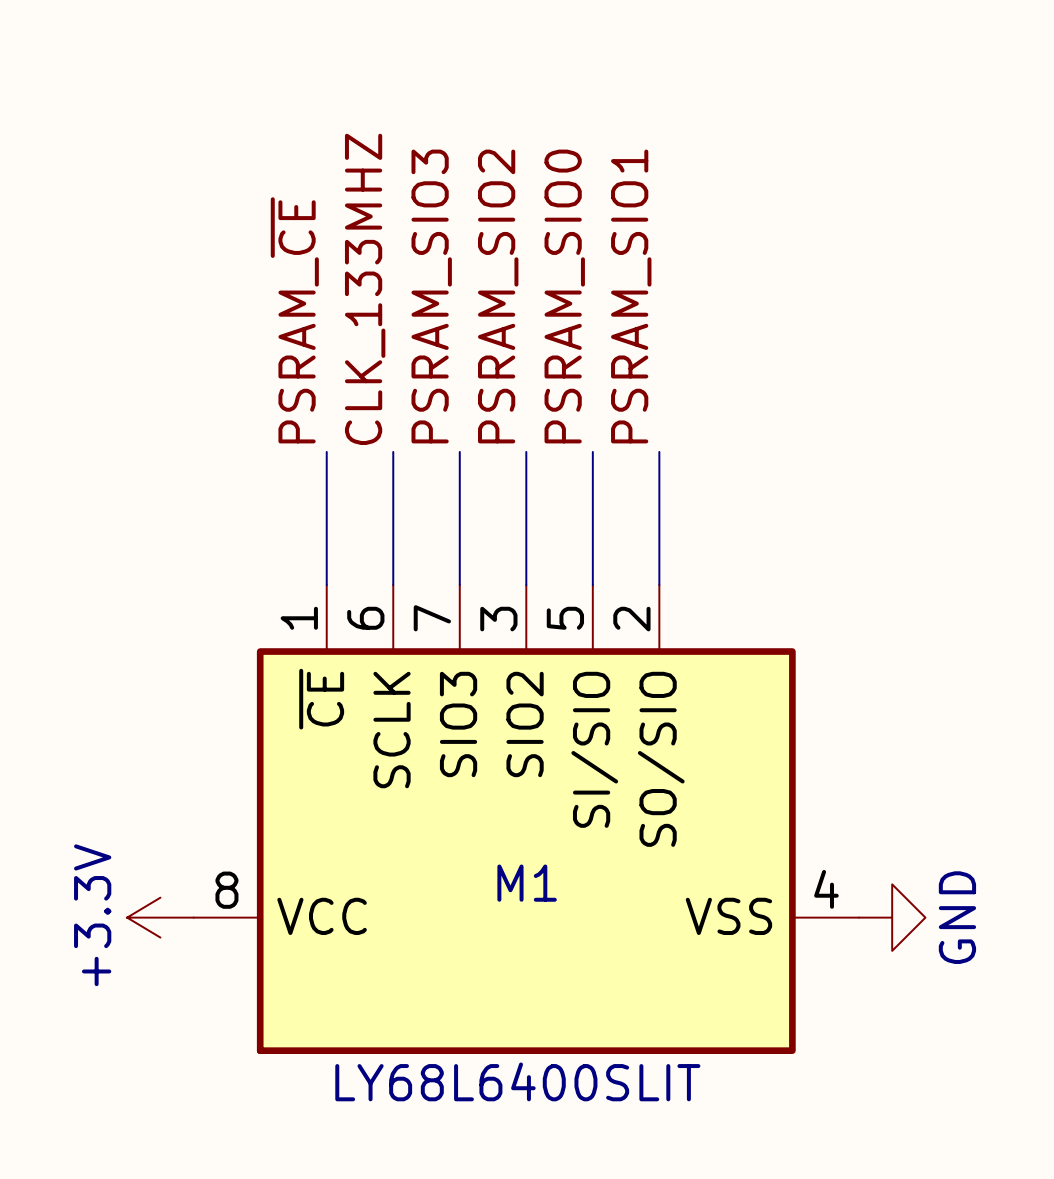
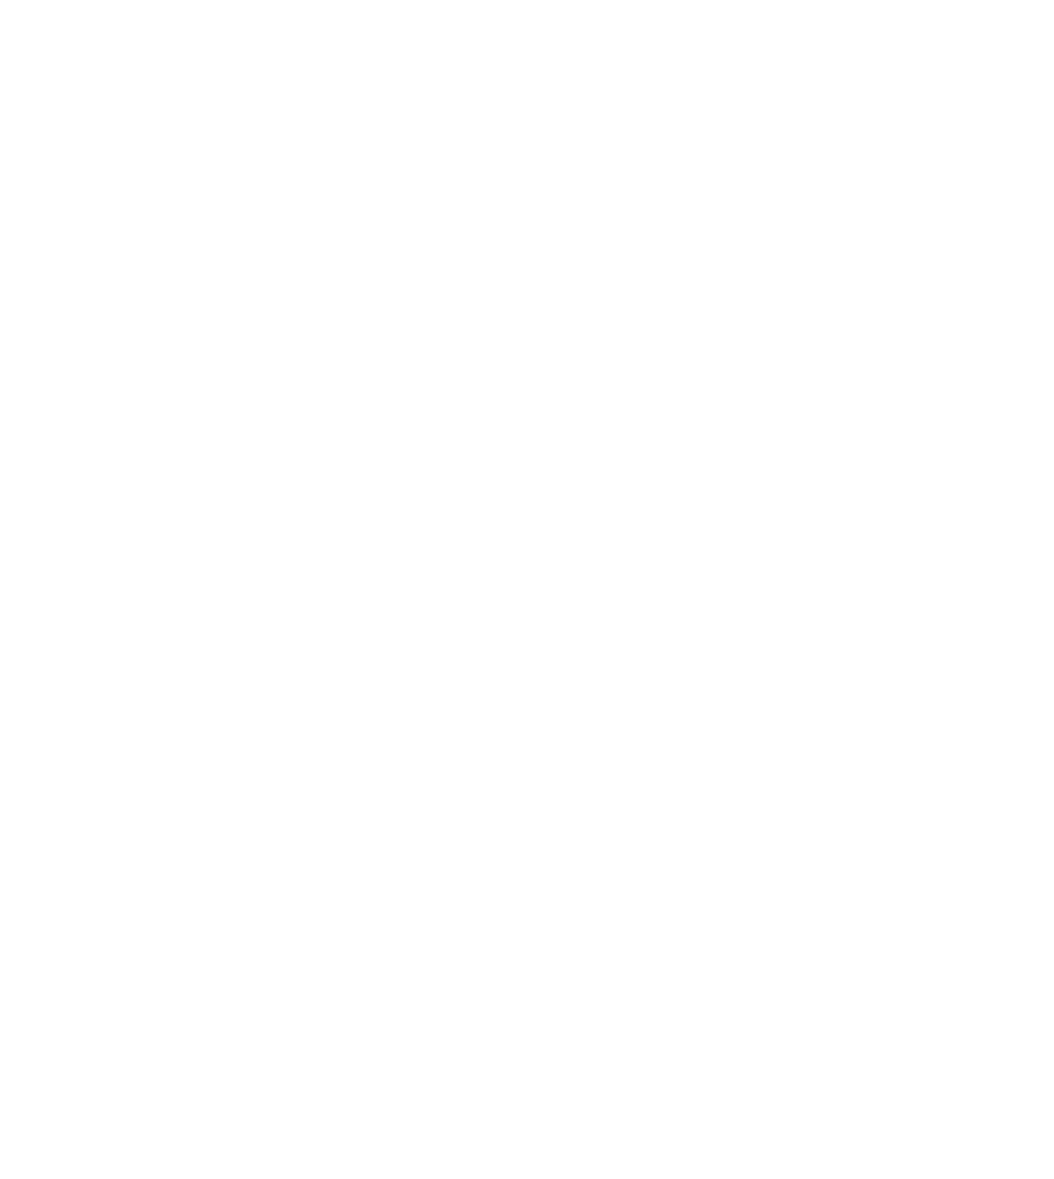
label: CLK_133MHZ (365, 289) -> none
label: PSRAM_SIO3 (431, 296) -> none
label: PSRAM_SIO2 (498, 296) -> none
label: PSRAM_SIO0 (564, 296) -> none
label: PSRAM_SIO1 (631, 296) -> none
label: PSRAM_~{CE} (294, 320) -> none
wire: (326, 451) (326, 585) -> none
wire: (393, 451) (393, 585) -> none
wire: (459, 451) (459, 585) -> none
wire: (526, 451) (526, 585) -> none
wire: (592, 451) (592, 585) -> none
wire: (659, 451) (659, 585) -> none
M1: LY68L6400SLIT (526, 819) -> none
power symbol: +3.3V (160, 917) -> none
power symbol: GND (892, 917) -> none

